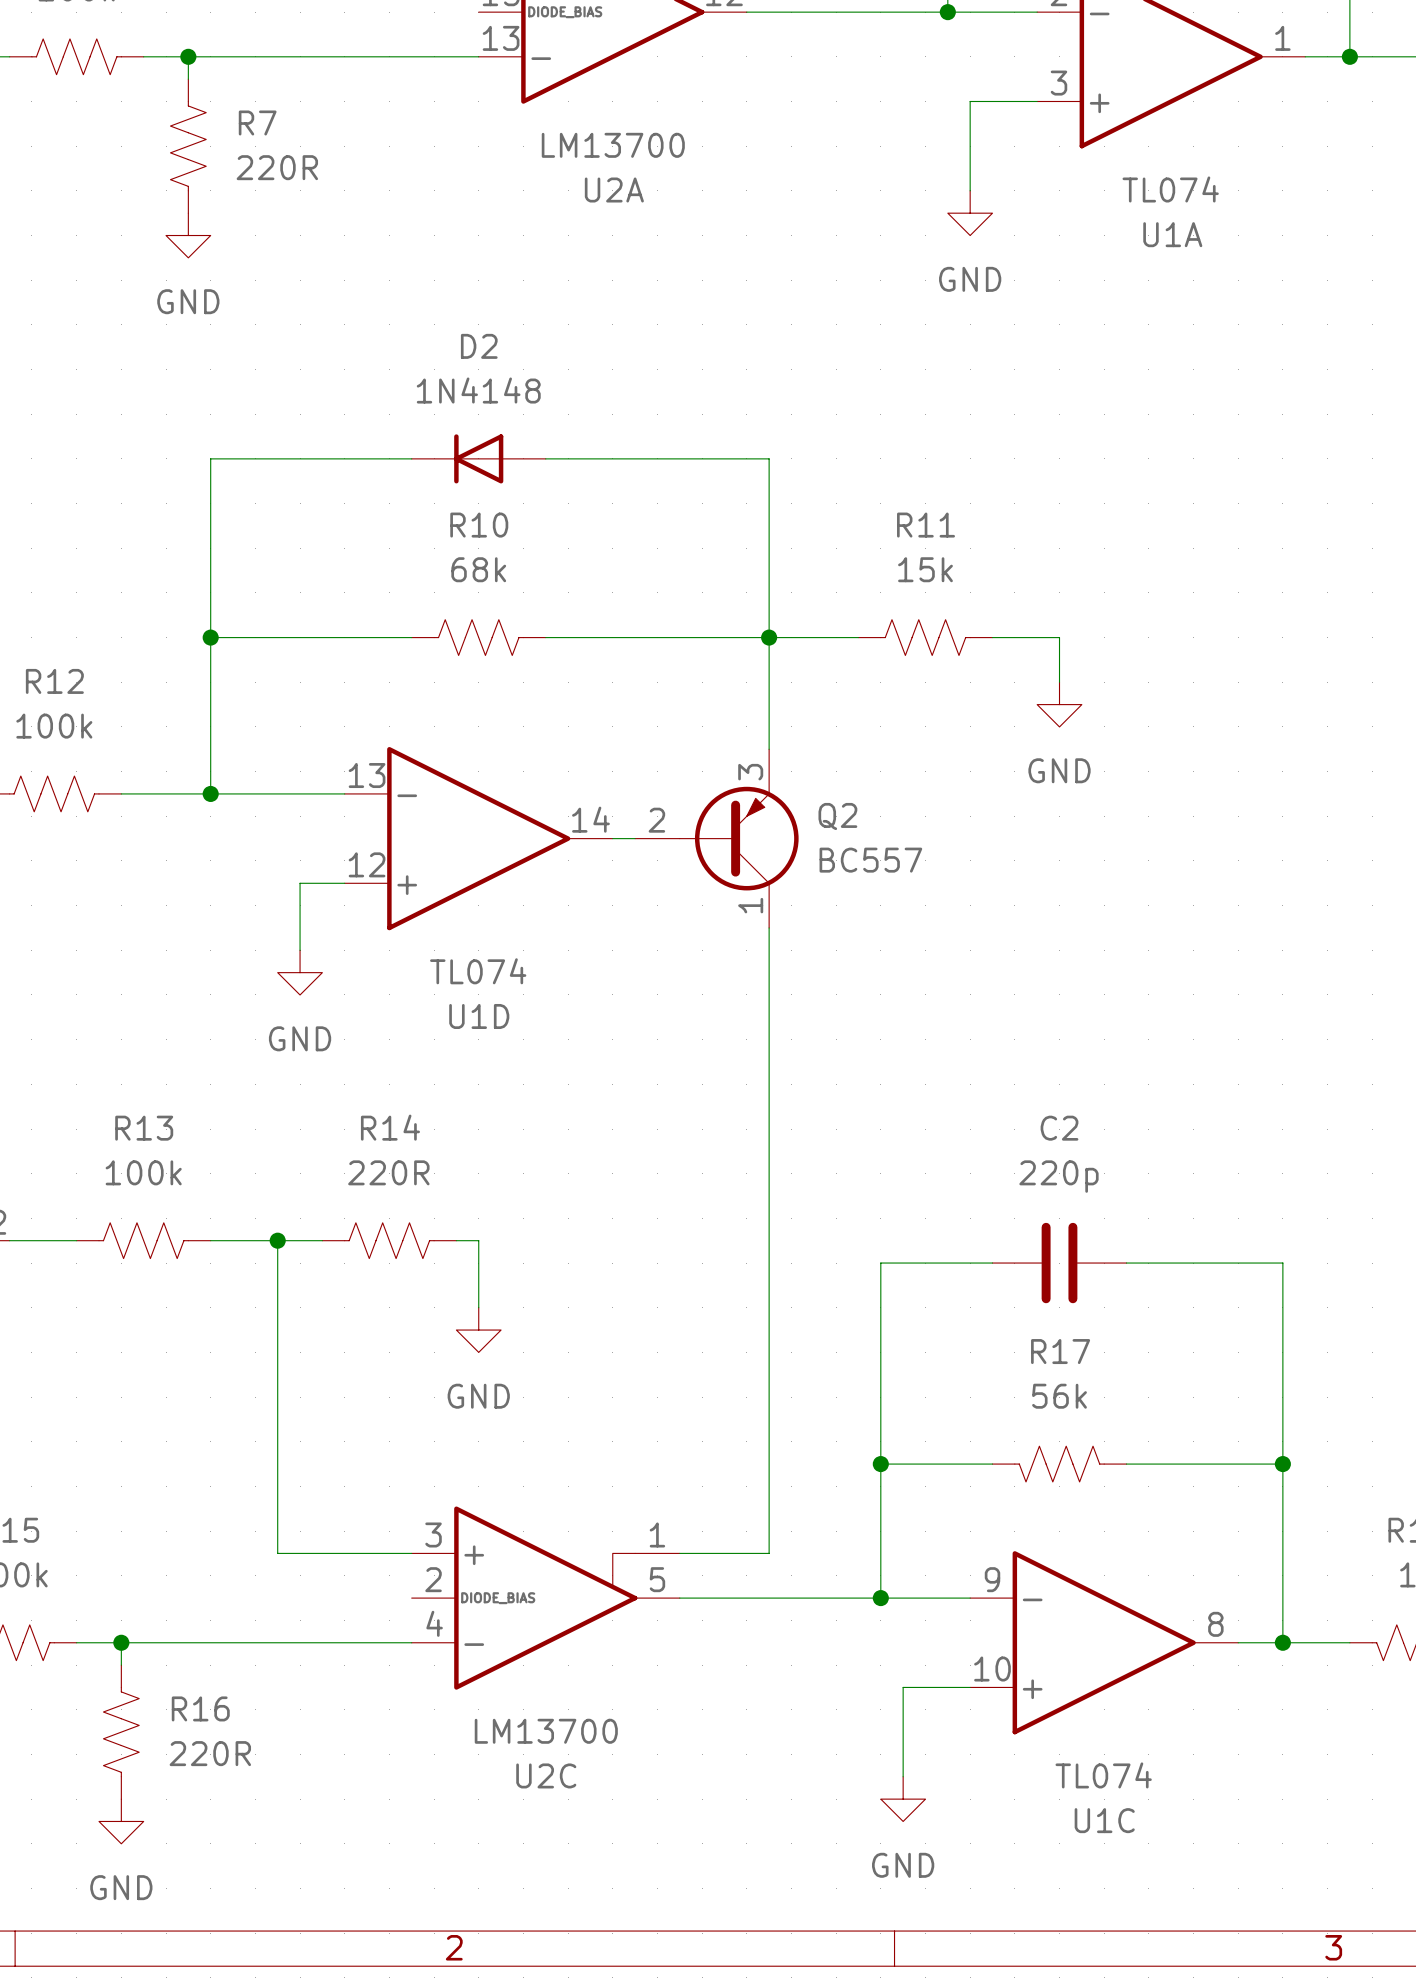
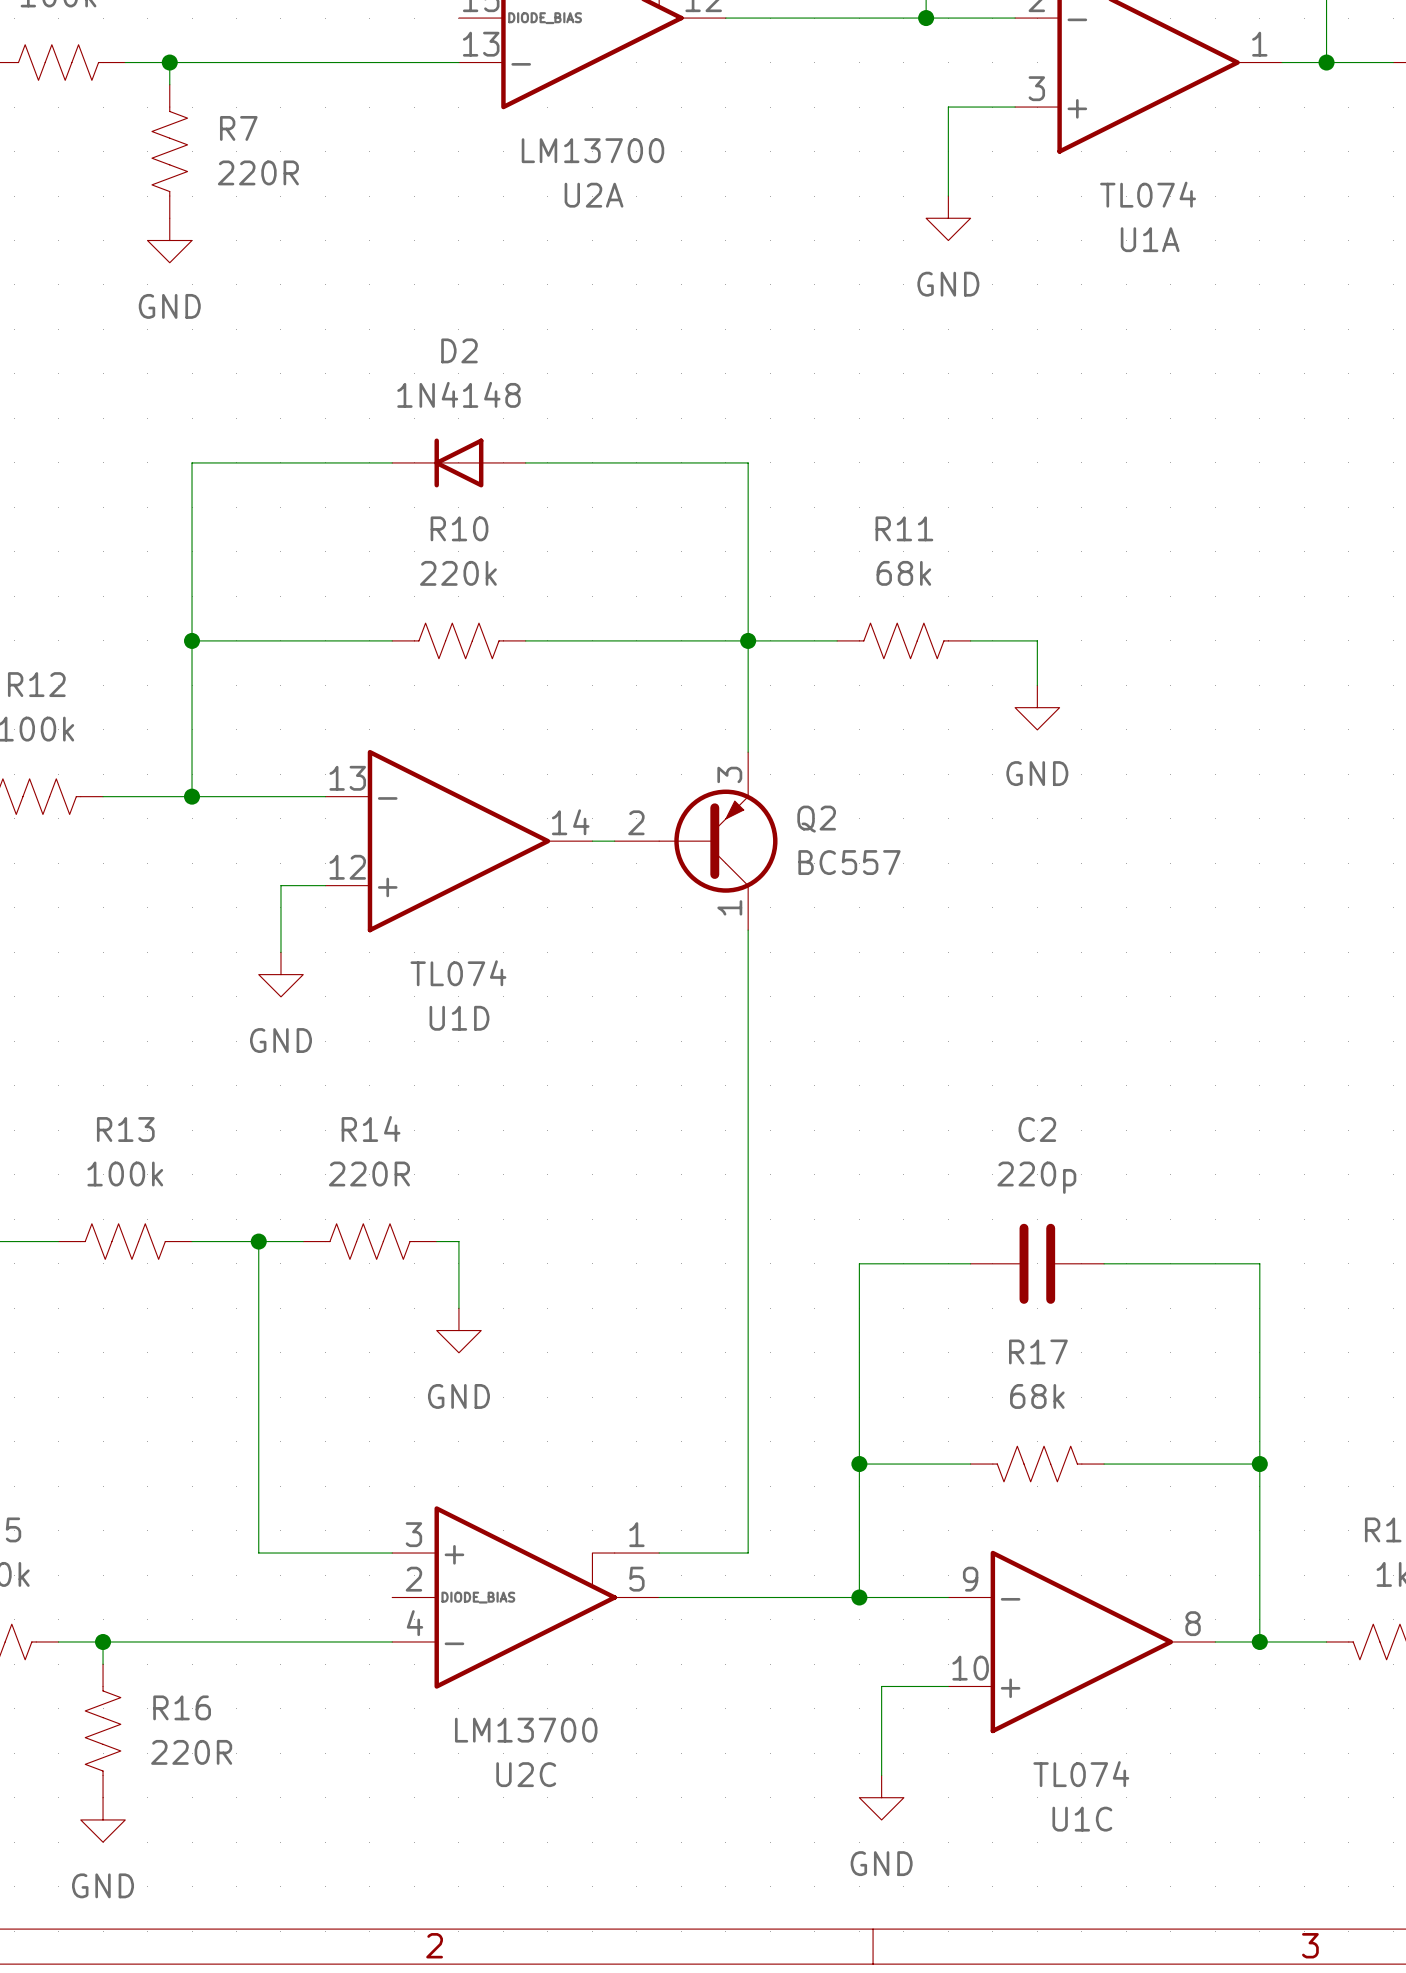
R10 value: 68k (478, 569) -> 220k (458, 573)
R11 value: 15k (925, 569) -> 68k (903, 573)
R17 value: 56k (1059, 1396) -> 68k (1037, 1396)

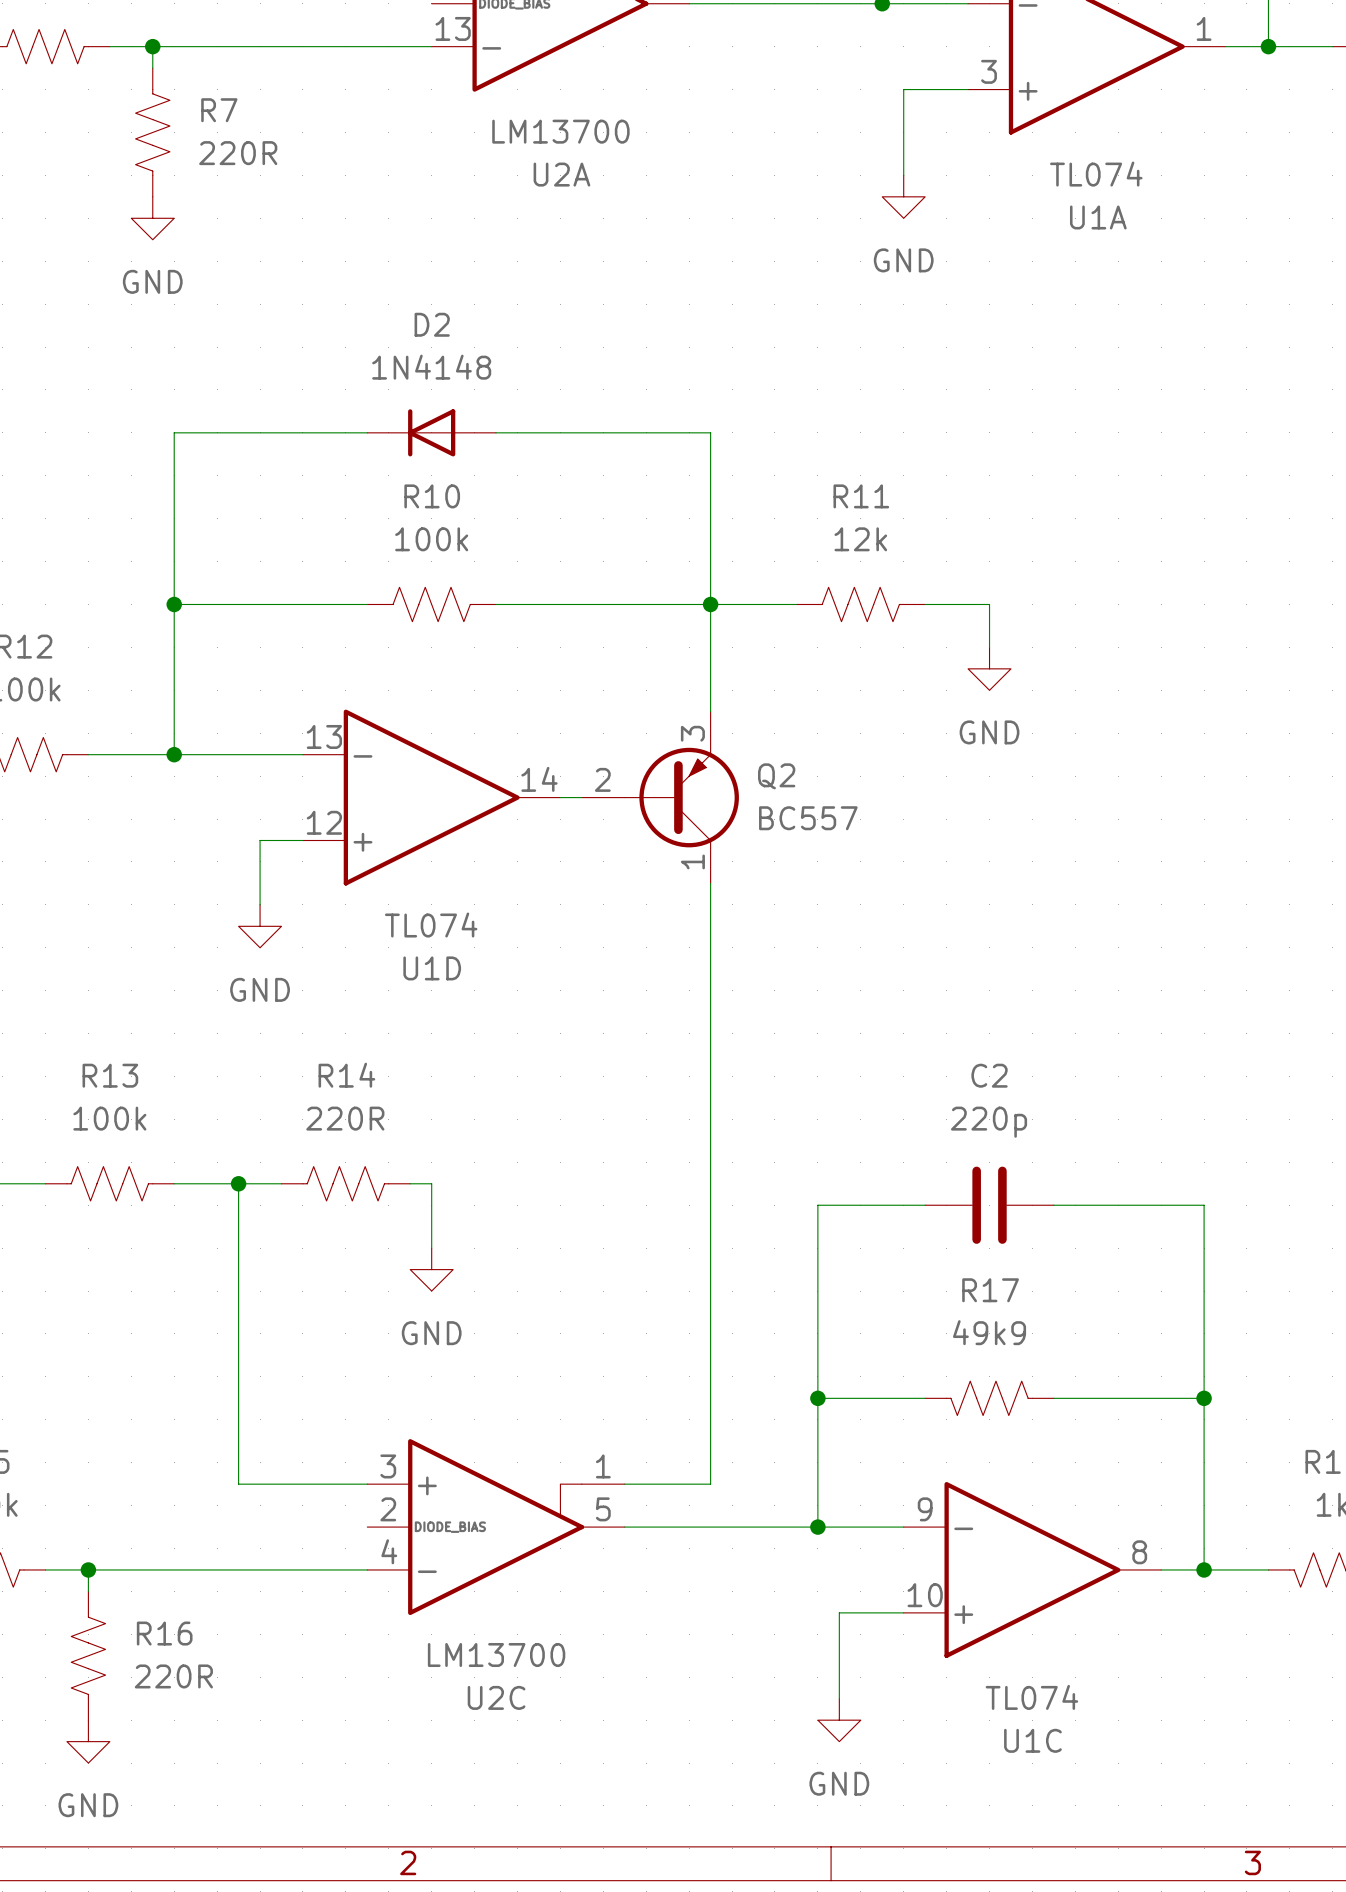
R10 value: 220k (458, 573) -> 100k (431, 539)
R11 value: 68k (903, 573) -> 12k (860, 539)
R17 value: 68k (1037, 1396) -> 49k9 (989, 1332)

